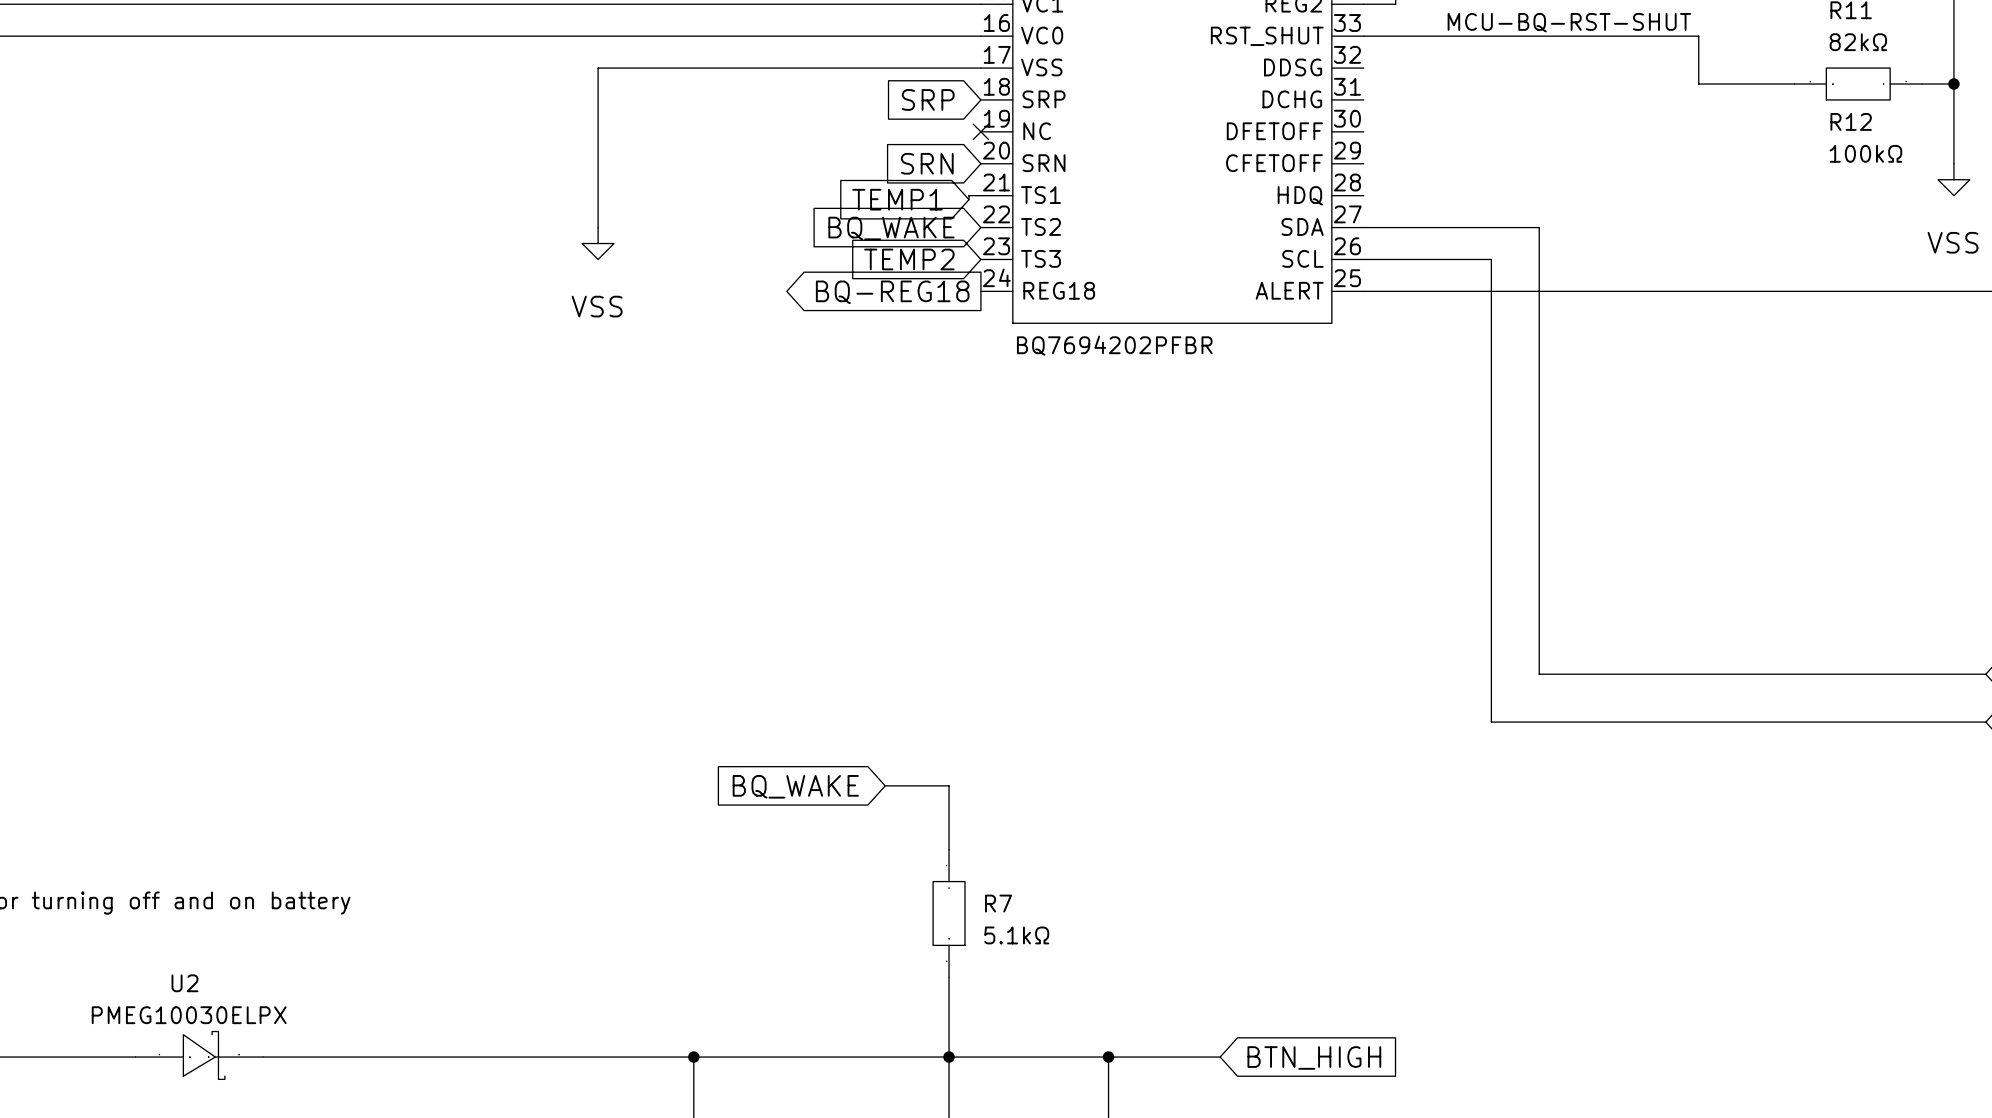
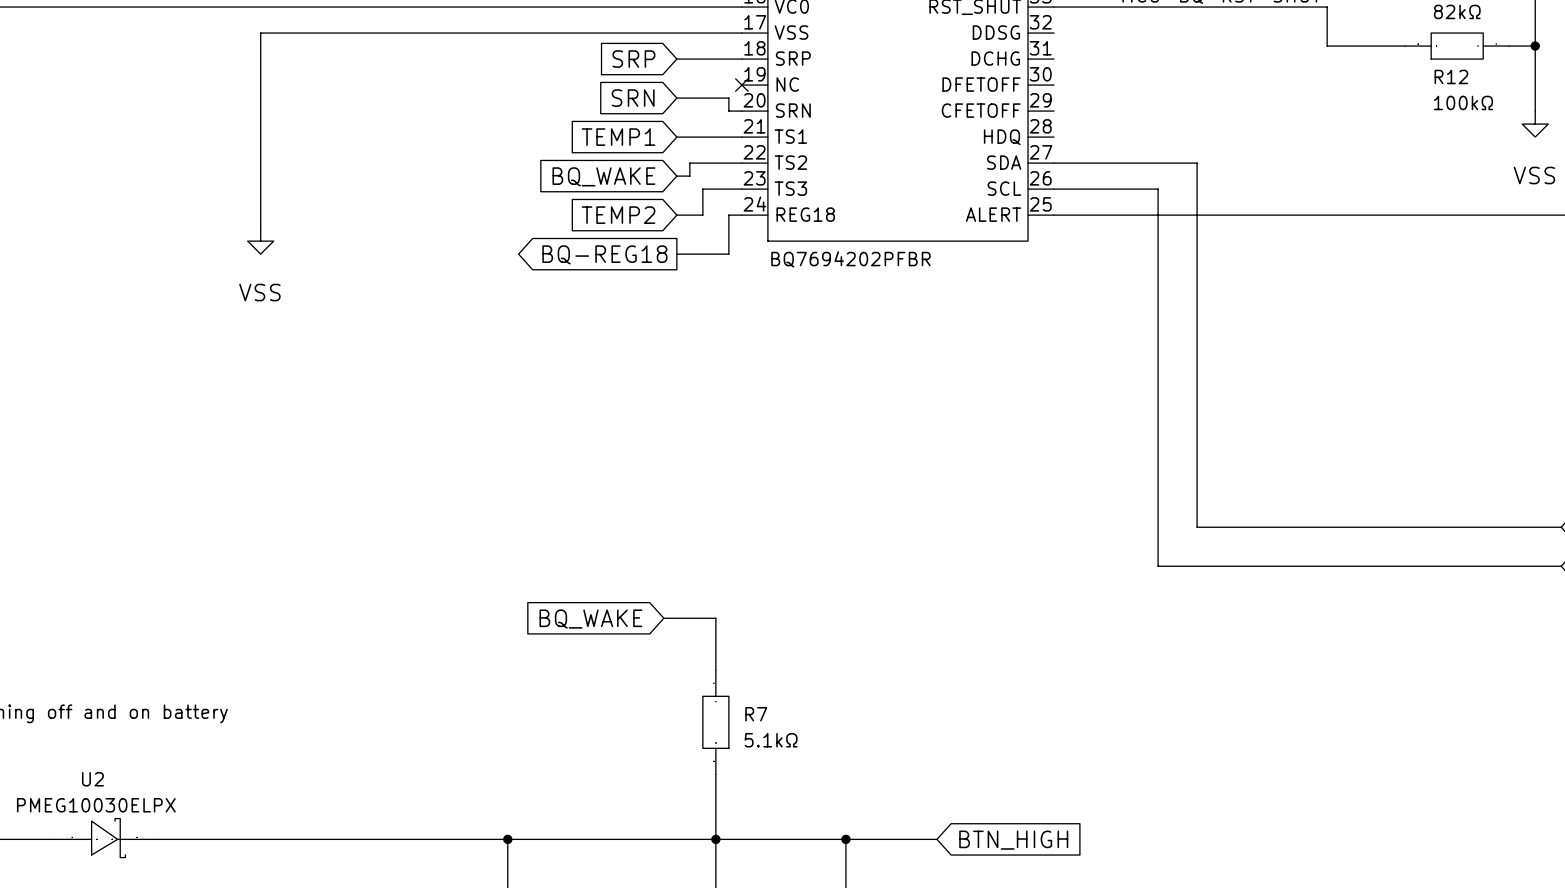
wire: (598, 68) (598, 227) -> (429, 33) (260, 33) (260, 228)
wire: none -> (676, 59) (741, 59)
global label position: SRP (928, 99) -> SRP (633, 59)
wire: none -> (676, 98) (728, 98) (728, 111) (741, 111)
global label position: SRN (927, 163) -> SRN (633, 98)
wire: (969, 195) (969, 199) -> (732, 137) (676, 137)
global label position: TEMP1 (897, 199) -> TEMP1 (618, 137)
wire: none -> (741, 163) (689, 163) (689, 176) (676, 176)
global label position: BQ_WAKE (891, 228) -> BQ_WAKE (603, 176)
power symbol position: VSS (598, 243) -> VSS (260, 241)
global label position: TEMP2 (909, 259) -> TEMP2 (618, 215)
wire: none -> (741, 189) (702, 189) (702, 215) (676, 215)
wire: none -> (741, 215) (728, 215) (728, 254) (676, 254)
global label position: BQ-REG18 (892, 292) -> BQ-REG18 (604, 254)

